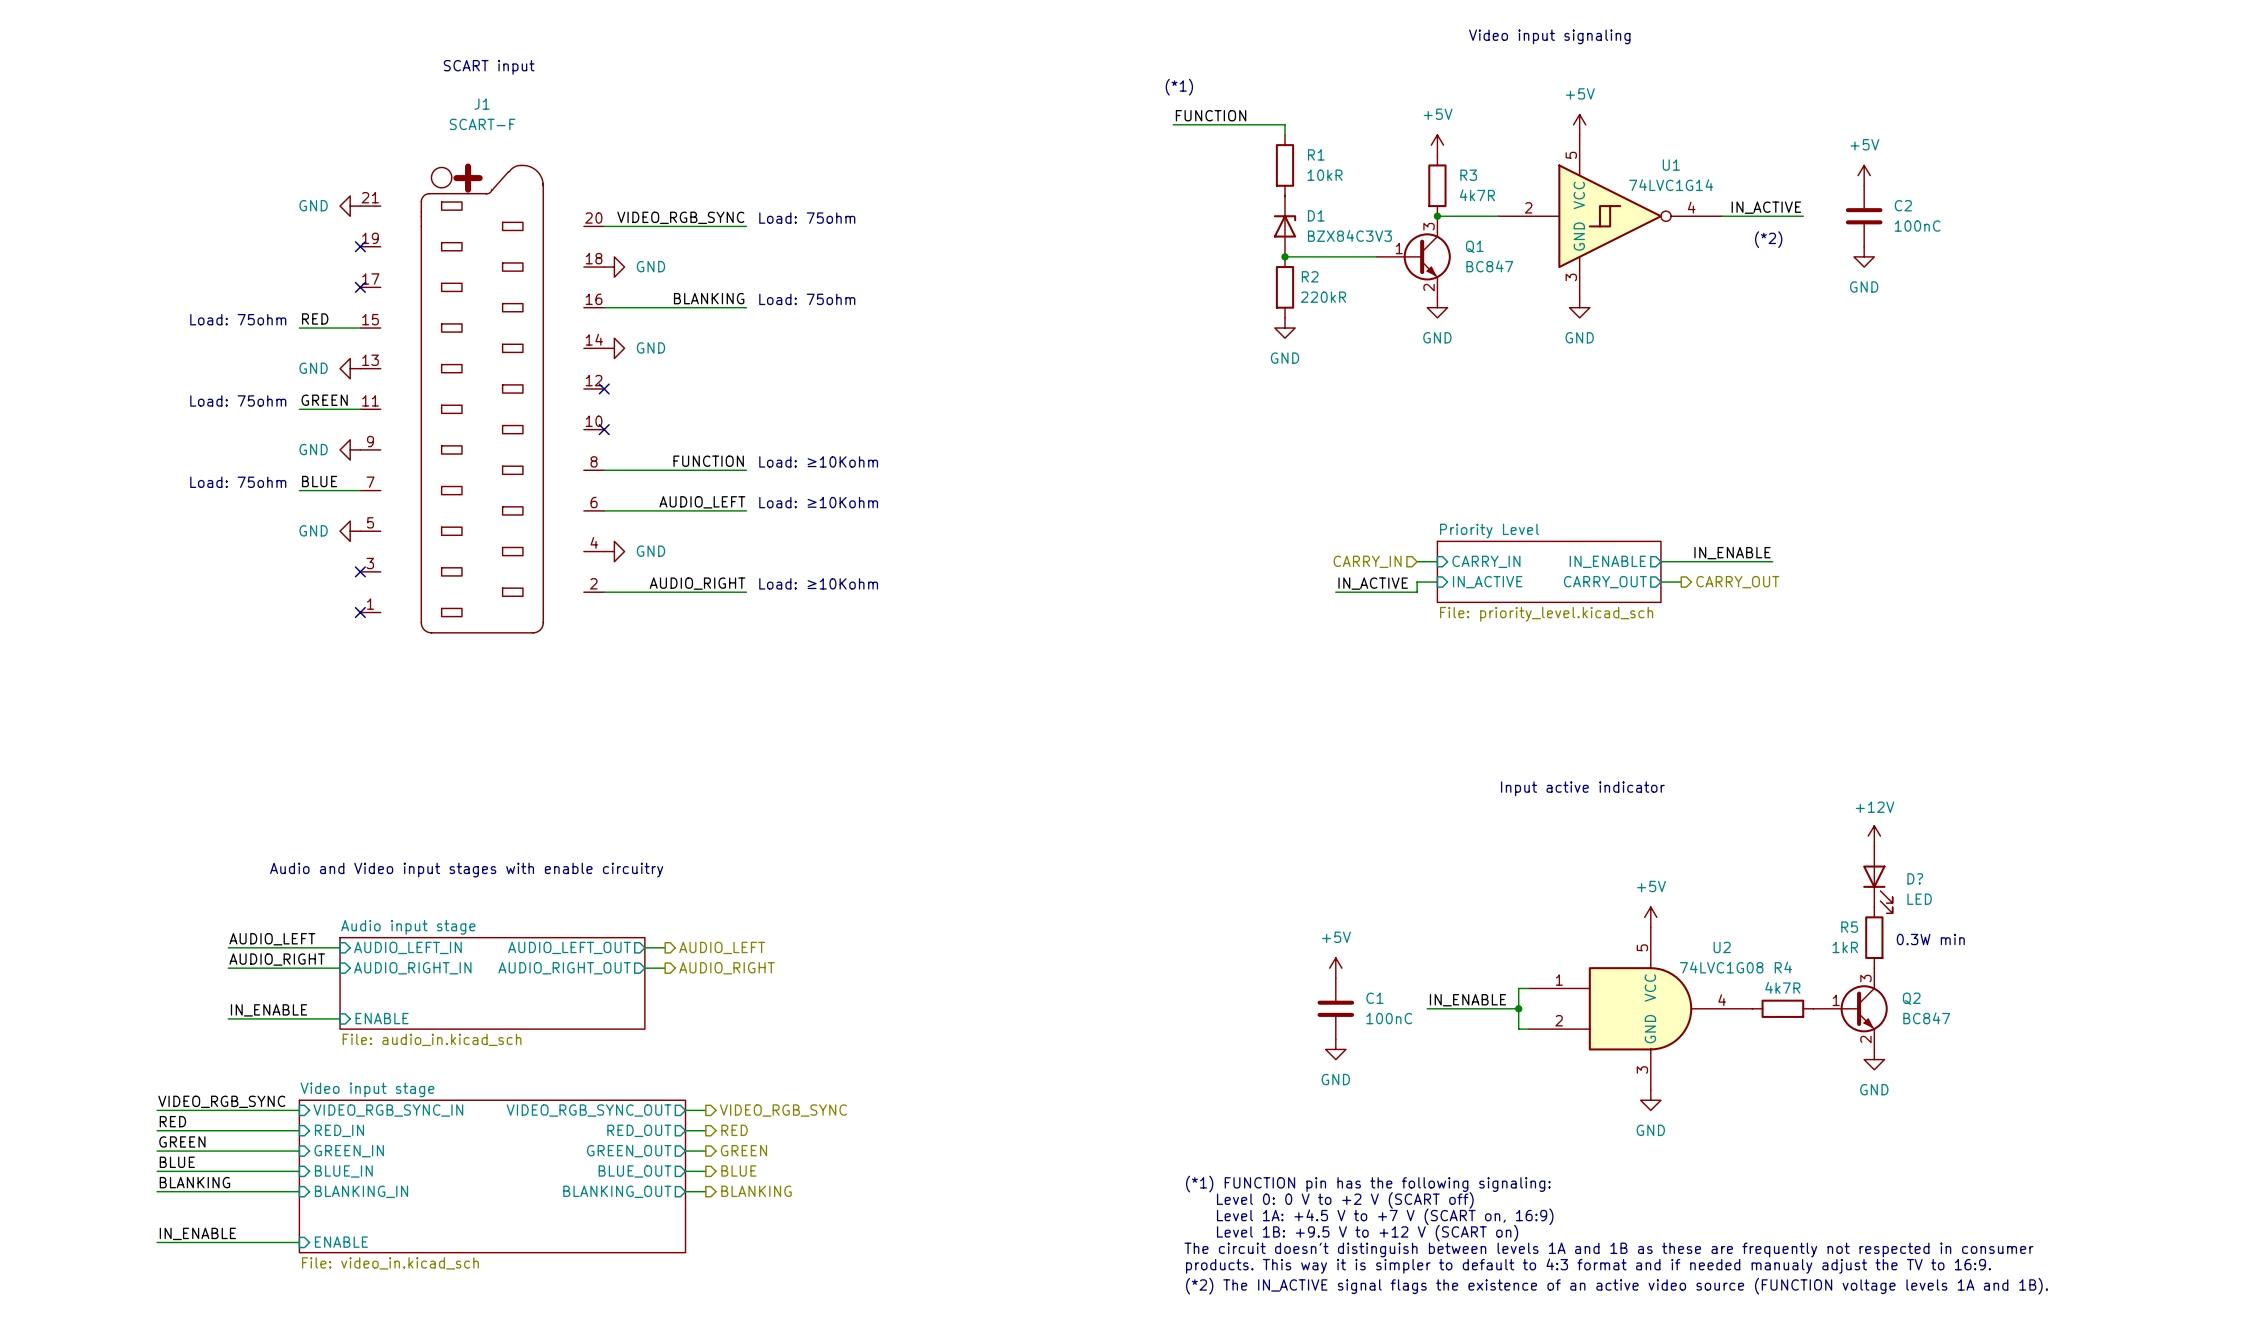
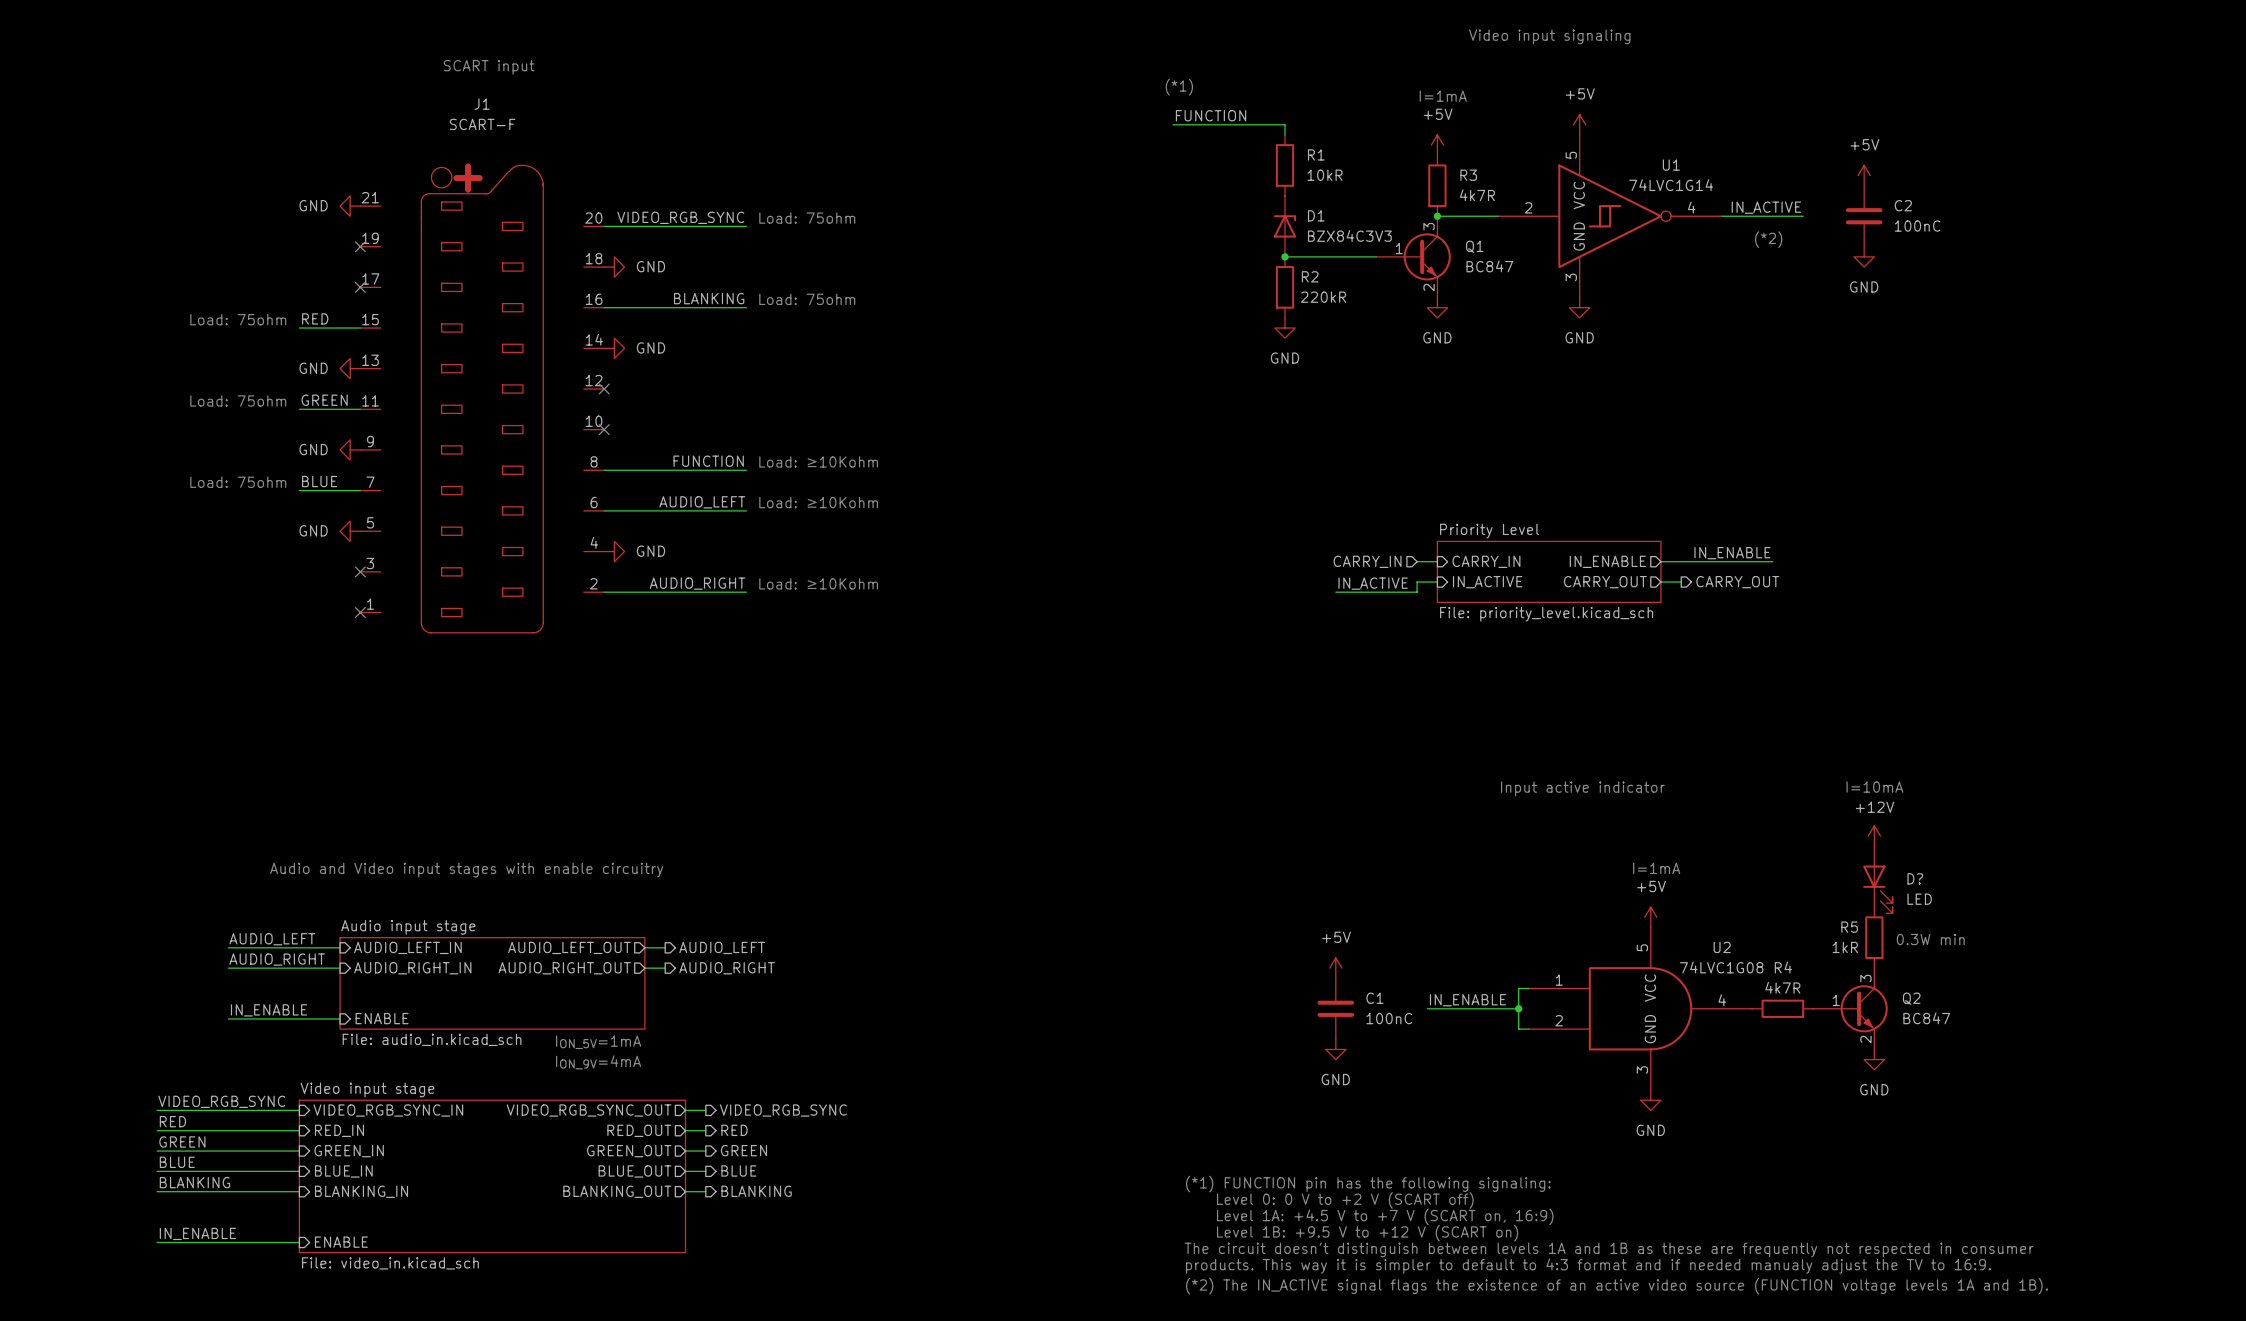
text: none -> I=1mA (1443, 96)
text: none -> I=10mA (1874, 787)
text: none -> I=1mA (1656, 868)
text: none -> ION_5V=1mA (598, 1042)
text: none -> ION_9V=4mA (598, 1062)

